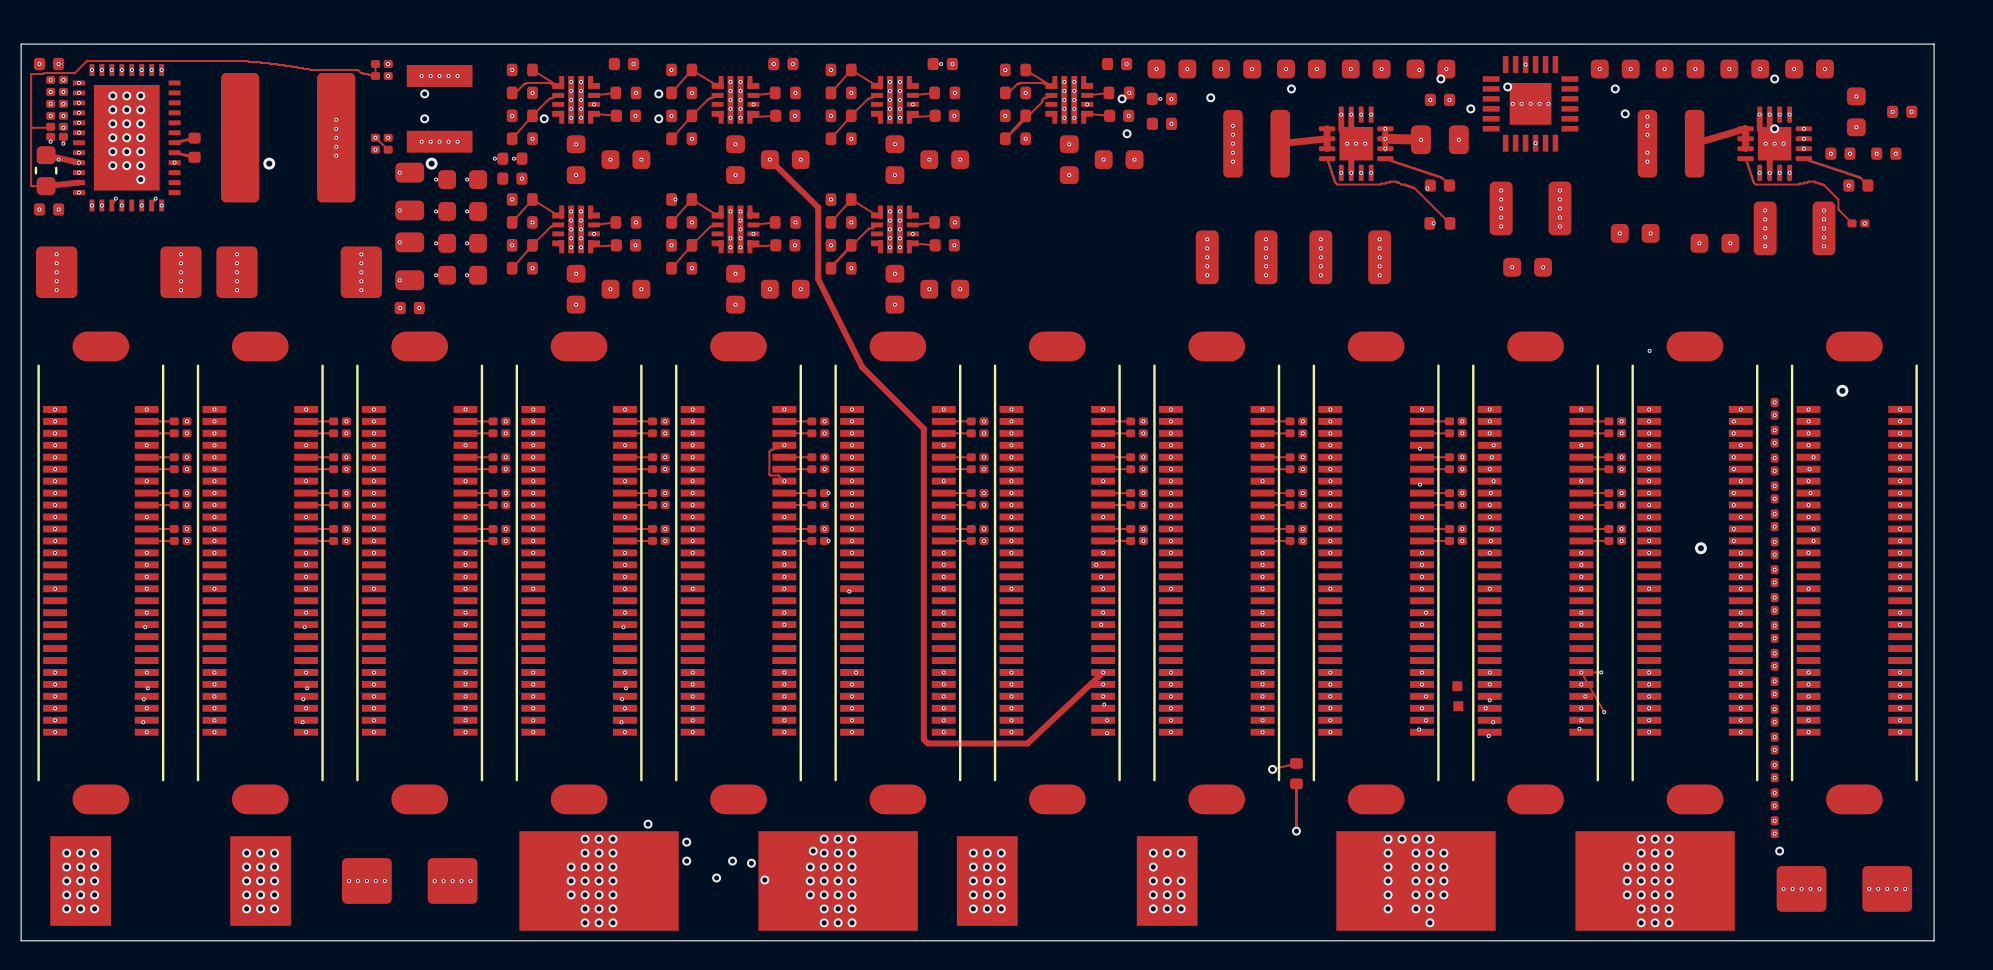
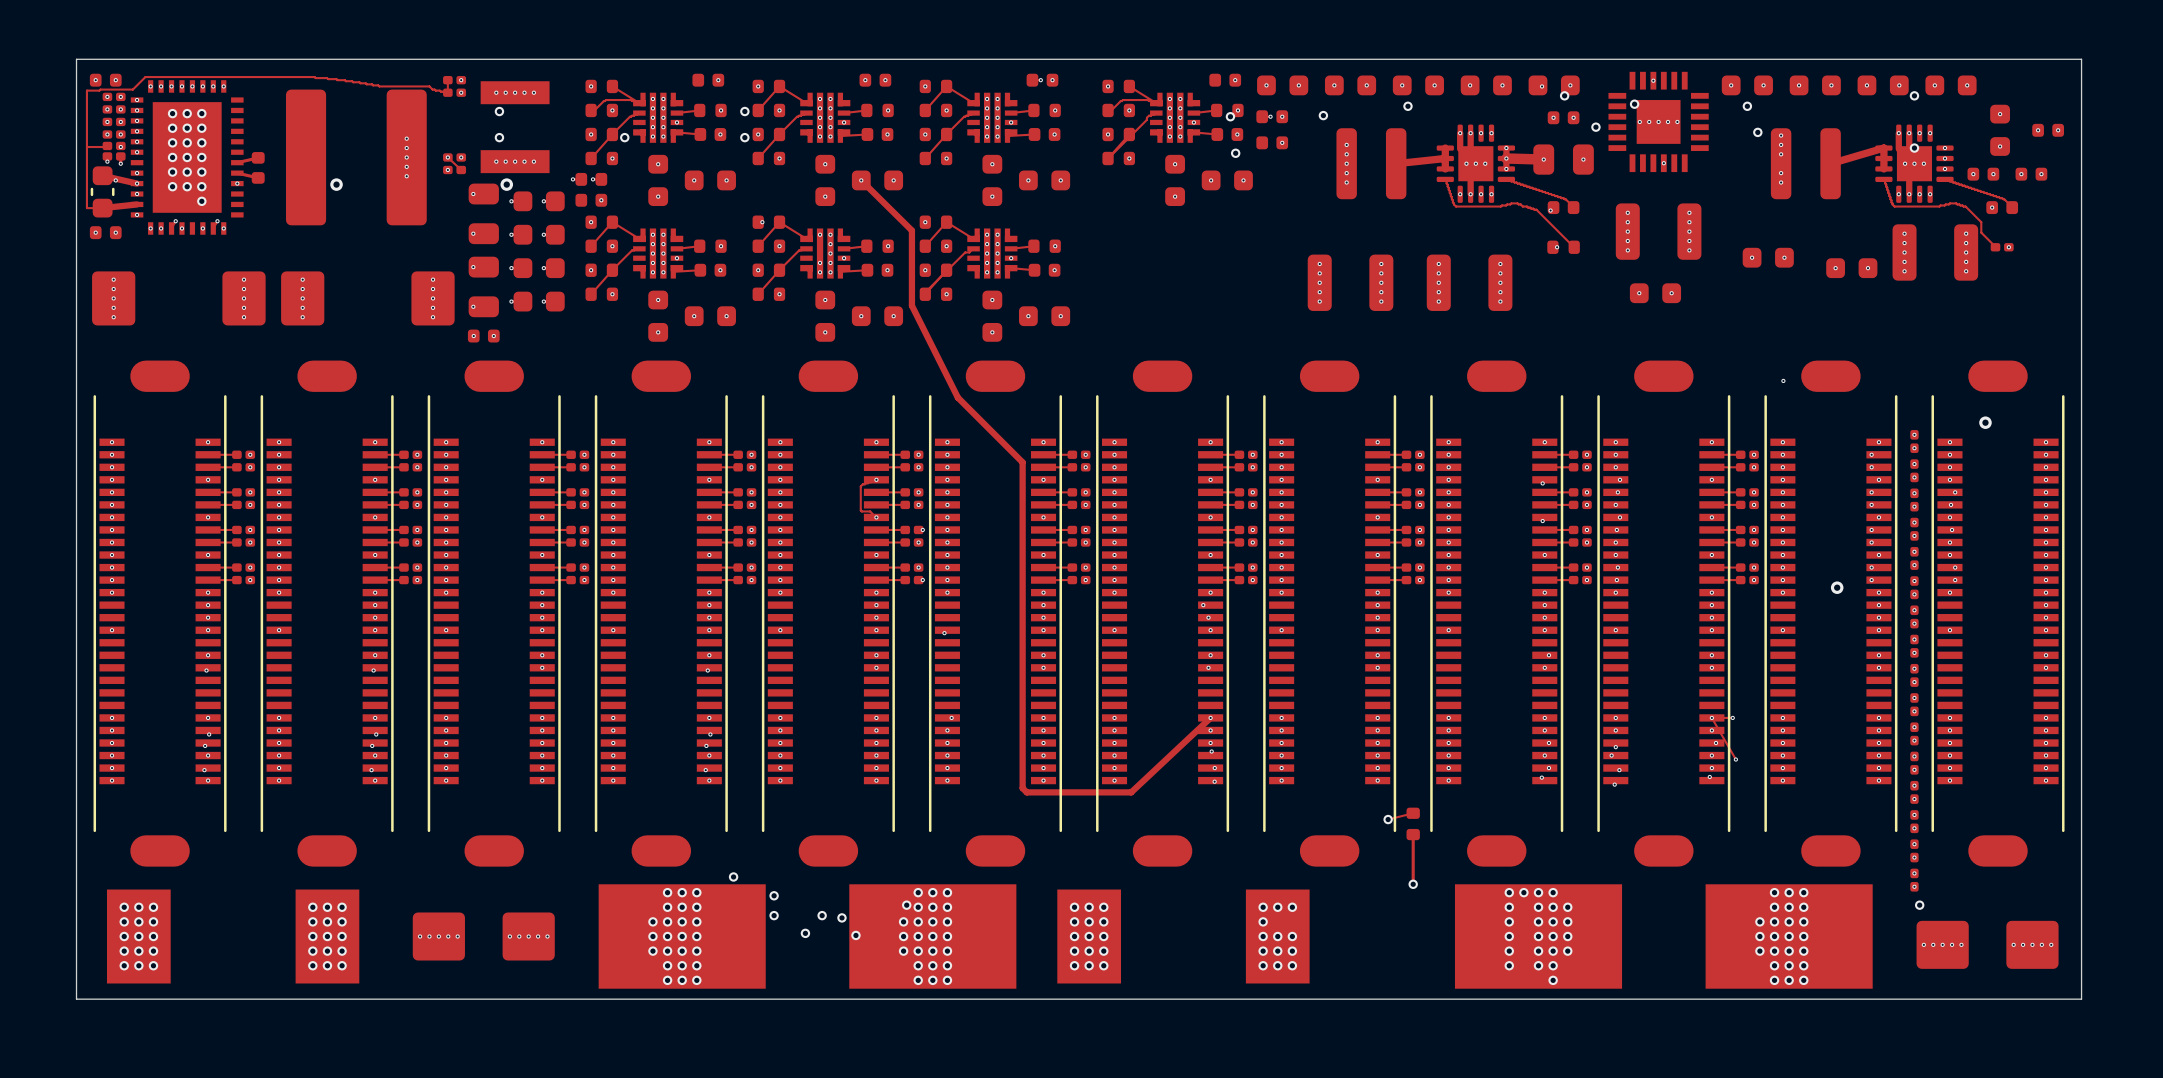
part: (1457, 686) -> none
part: (1458, 706) -> none

